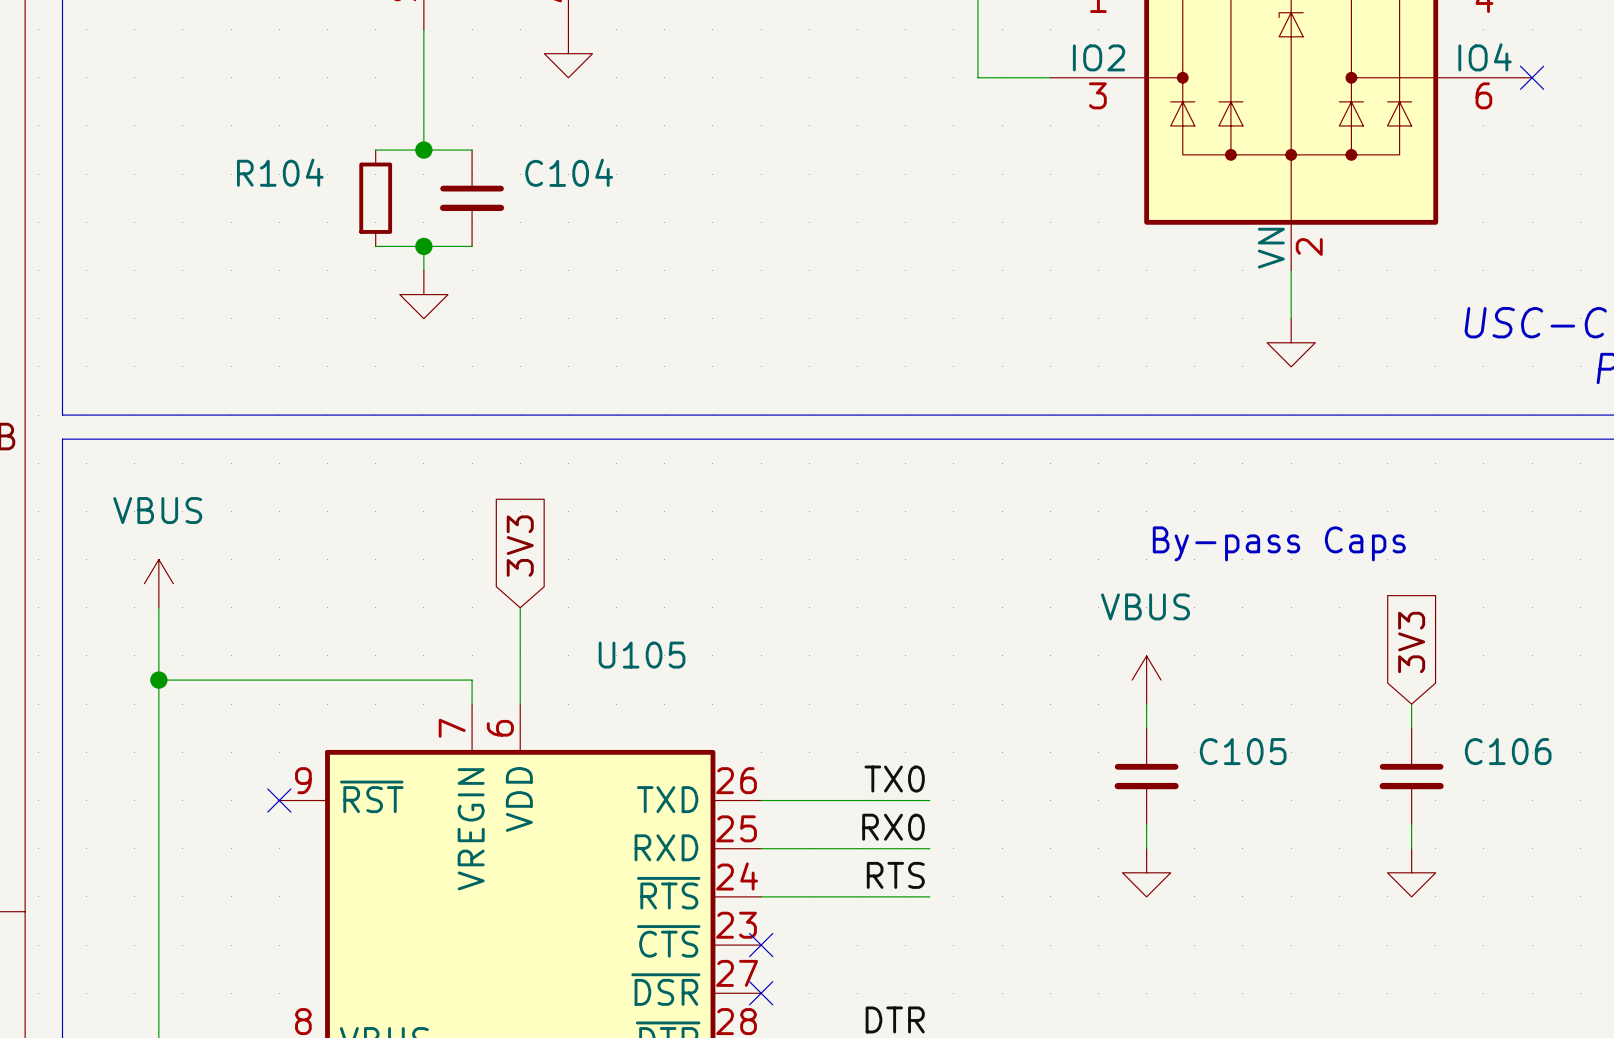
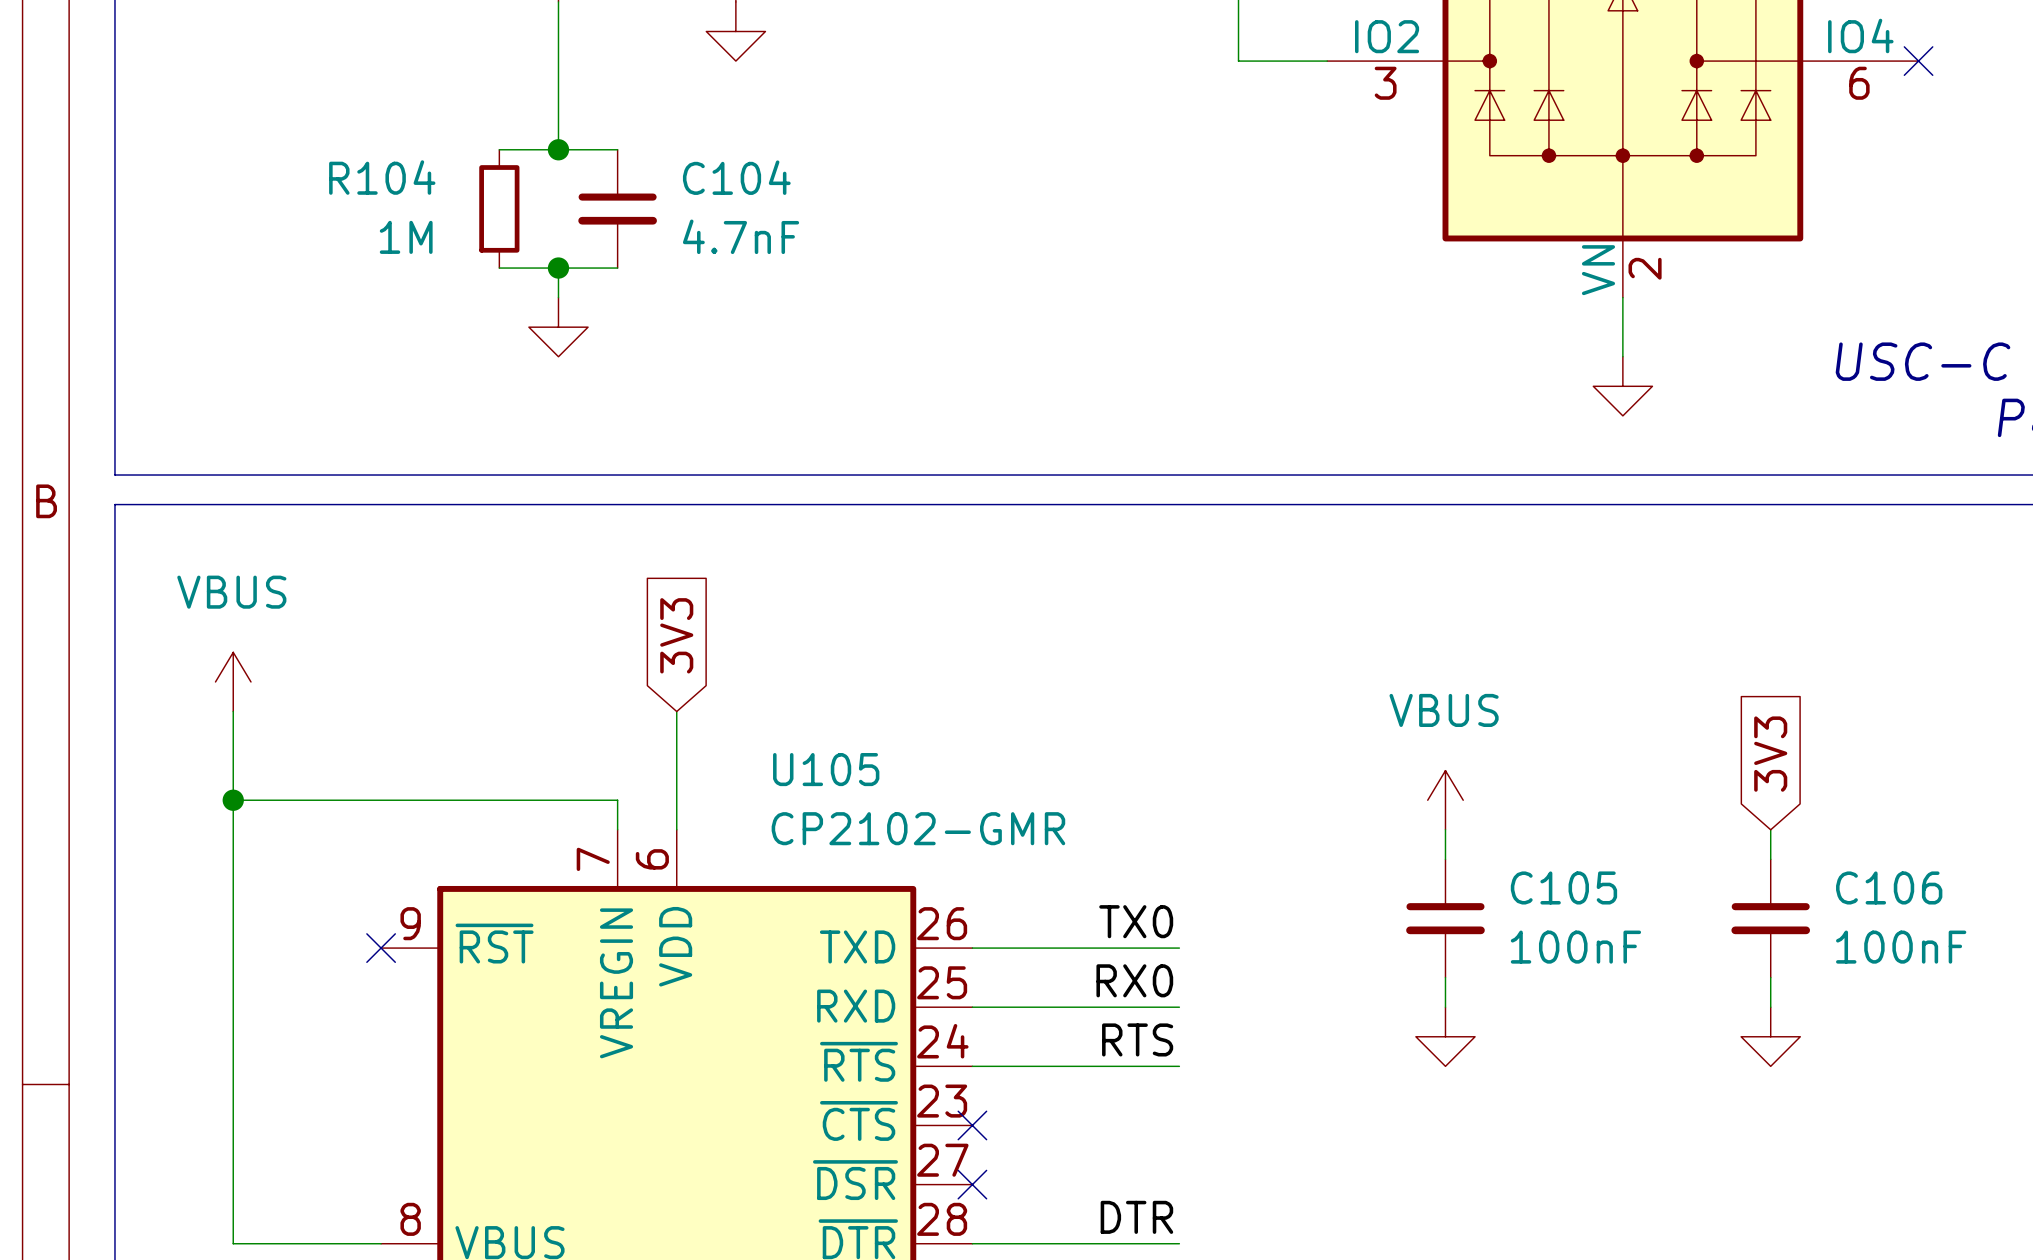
C104 value: none -> 4.7nF (741, 236)
R104 value: none -> 1M (406, 237)
text: By-pass Caps (1279, 543) -> none
U105 value: none -> CP2102-GMR (918, 828)
C105 value: none -> 100nF (1575, 947)
C106 value: none -> 100nF (1901, 947)

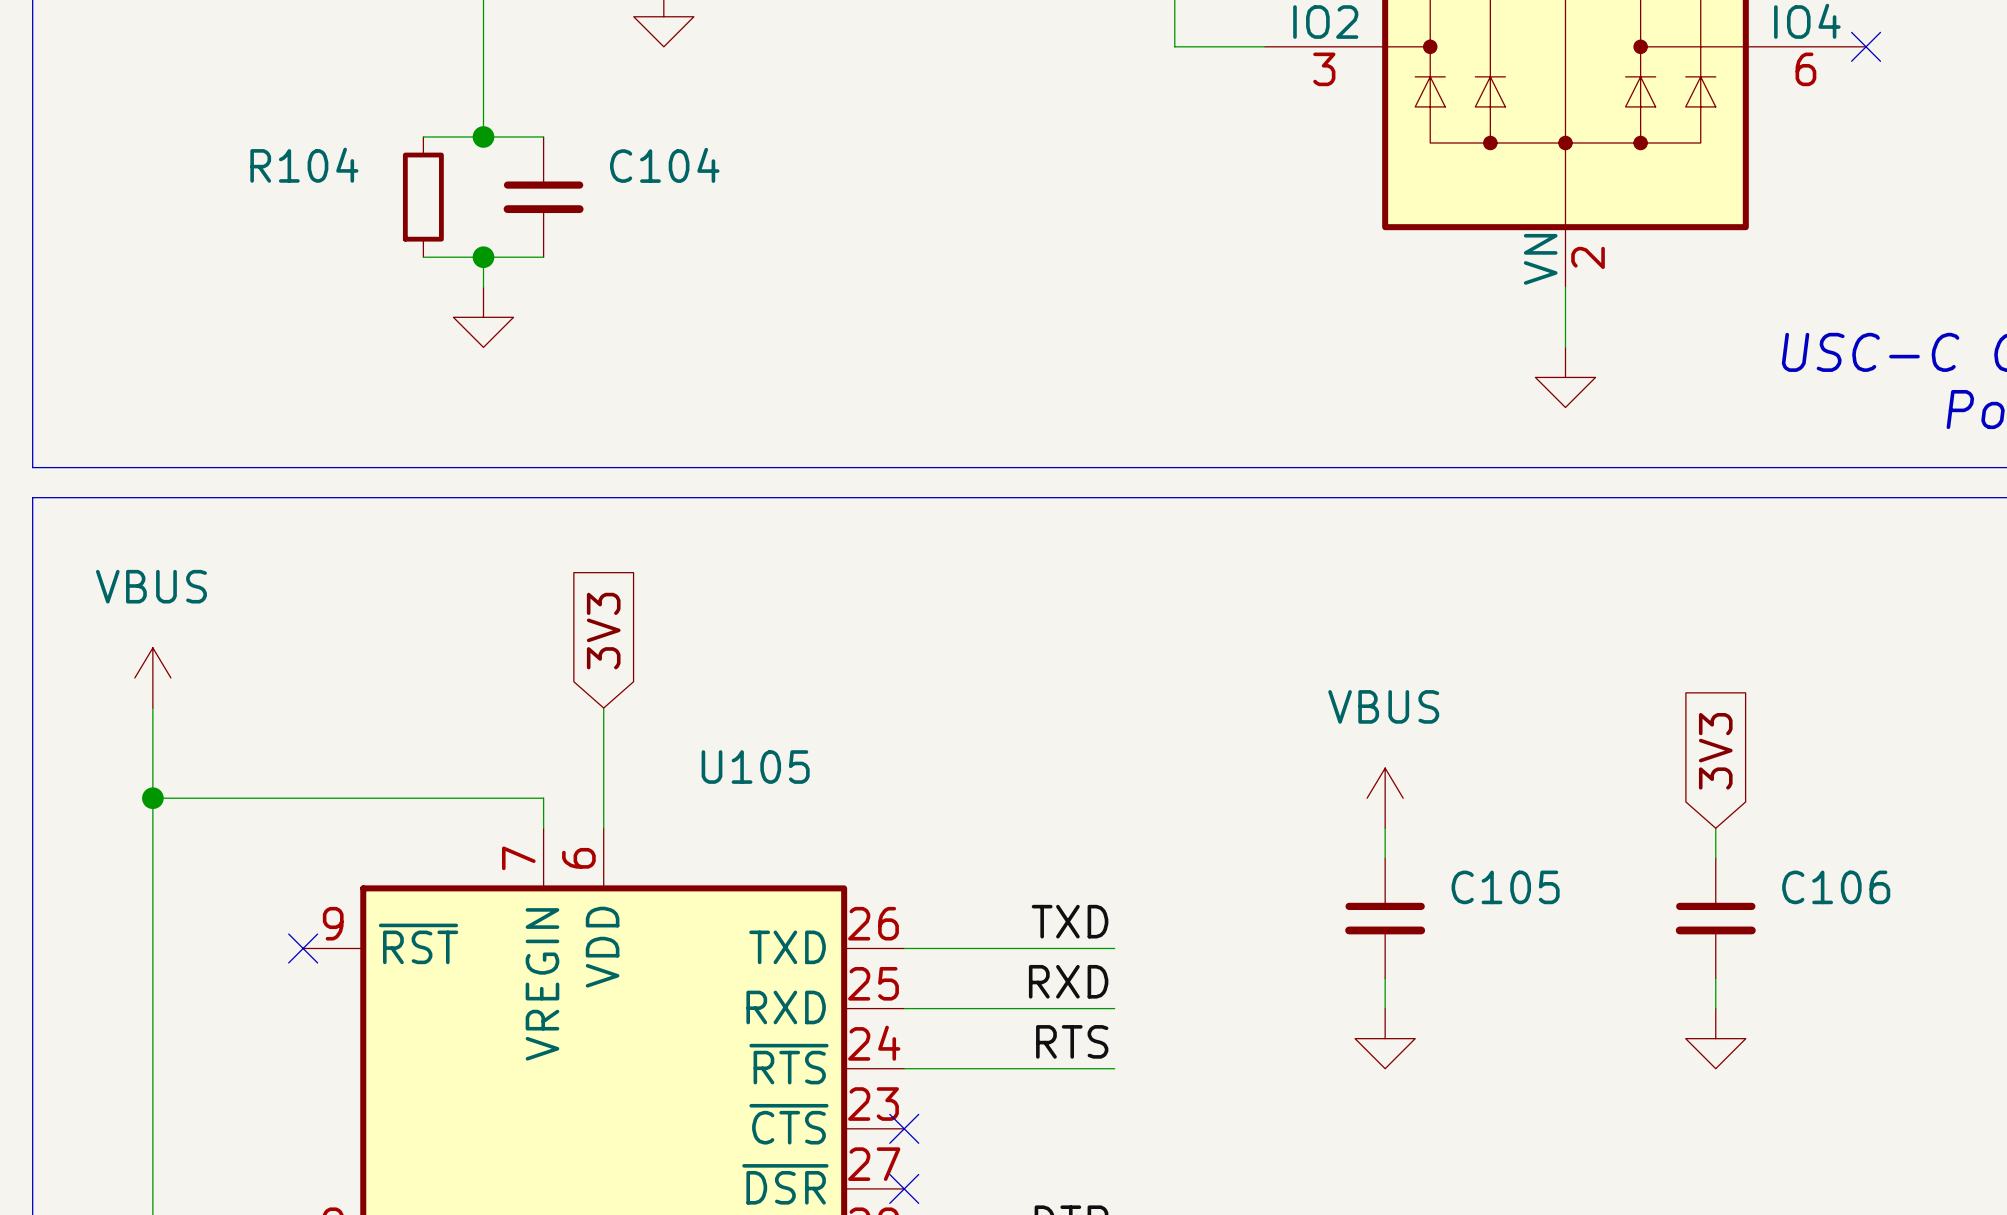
C104 value: 4.7nF (741, 236) -> none
R104 value: 1M (406, 237) -> none
U105 value: CP2102-GMR (918, 828) -> none
label: TX0 (1136, 921) -> TXD (1070, 921)
C105 value: 100nF (1575, 947) -> none
C106 value: 100nF (1901, 947) -> none
label: RX0 (1134, 980) -> RXD (1068, 981)

